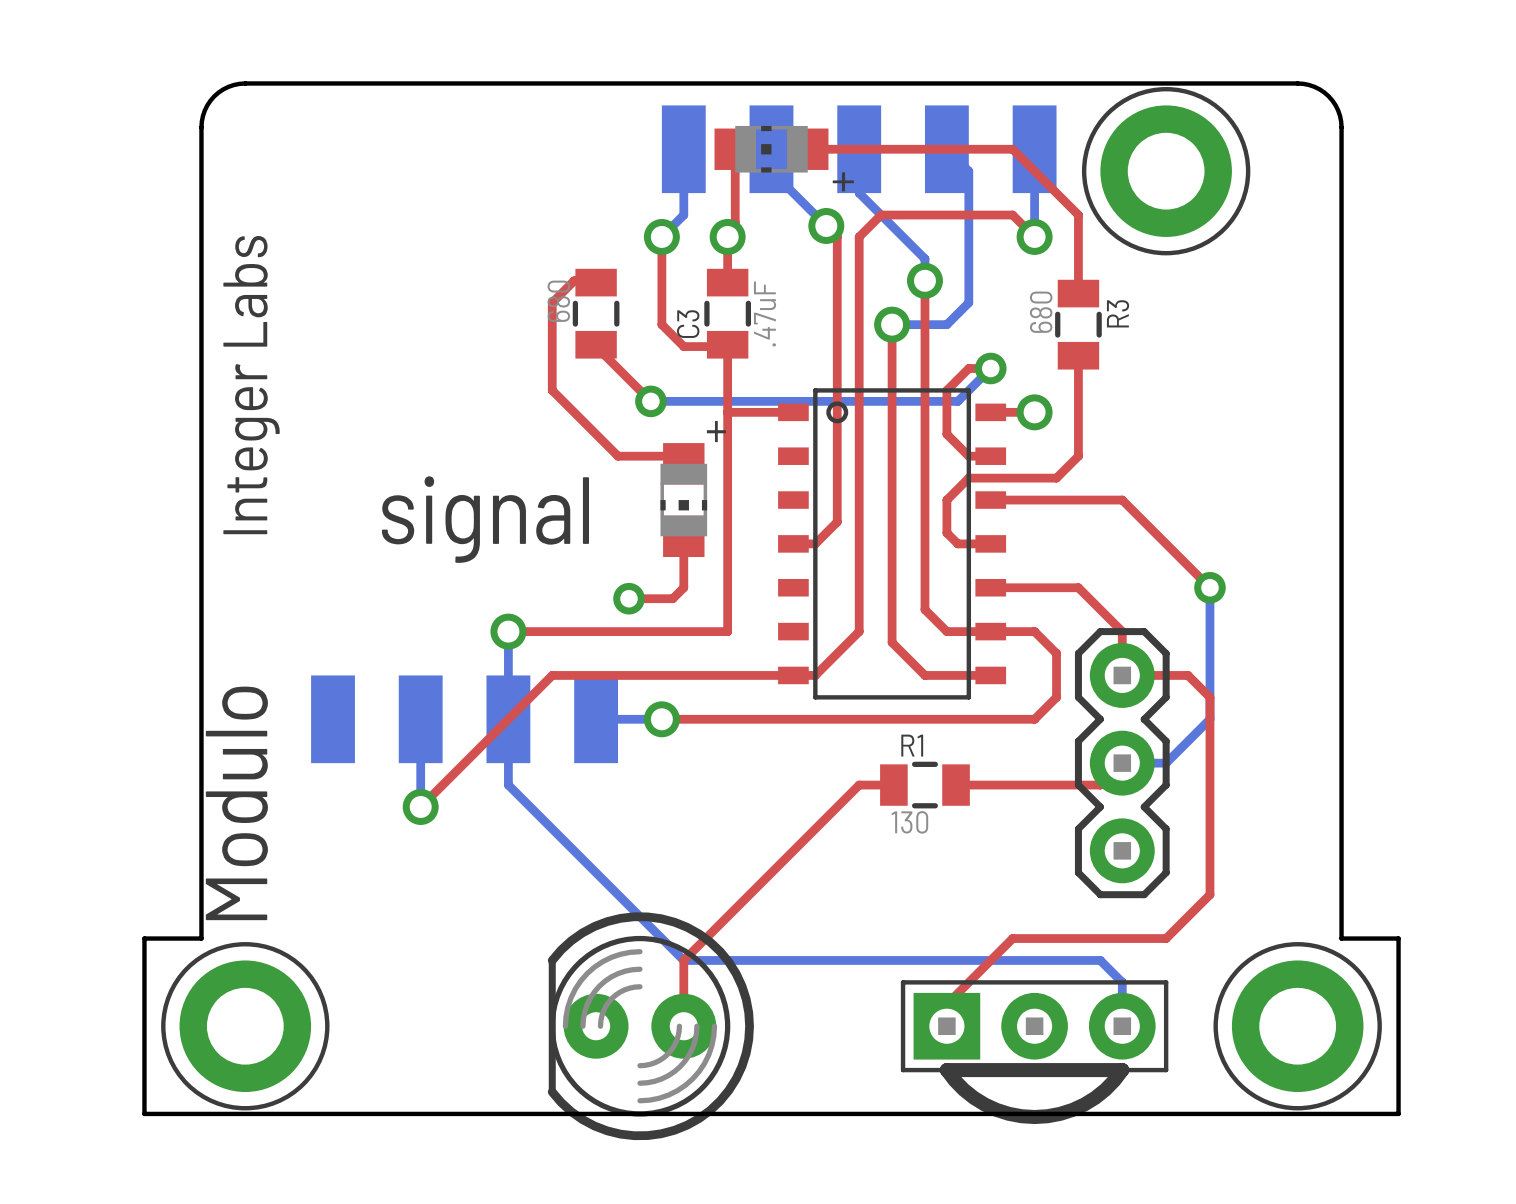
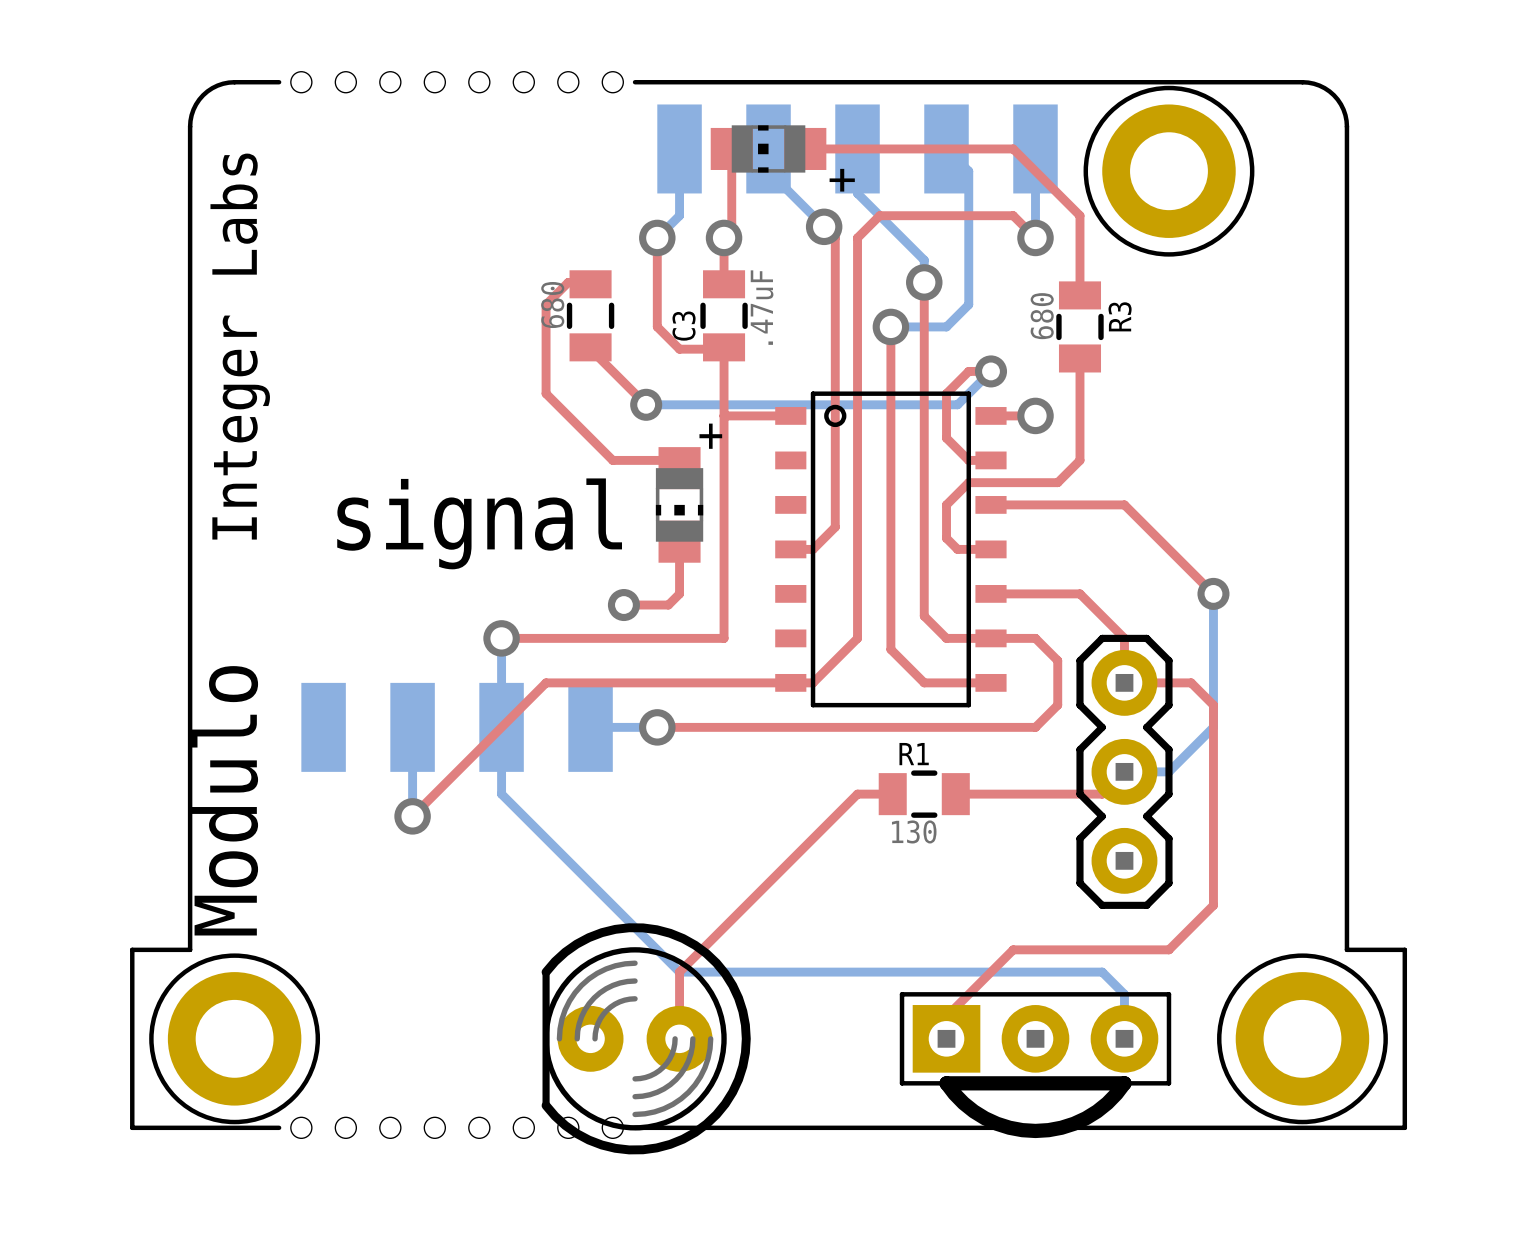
part footprint: [142, 81, 1401, 1117] -> [130, 71, 1408, 1139]

